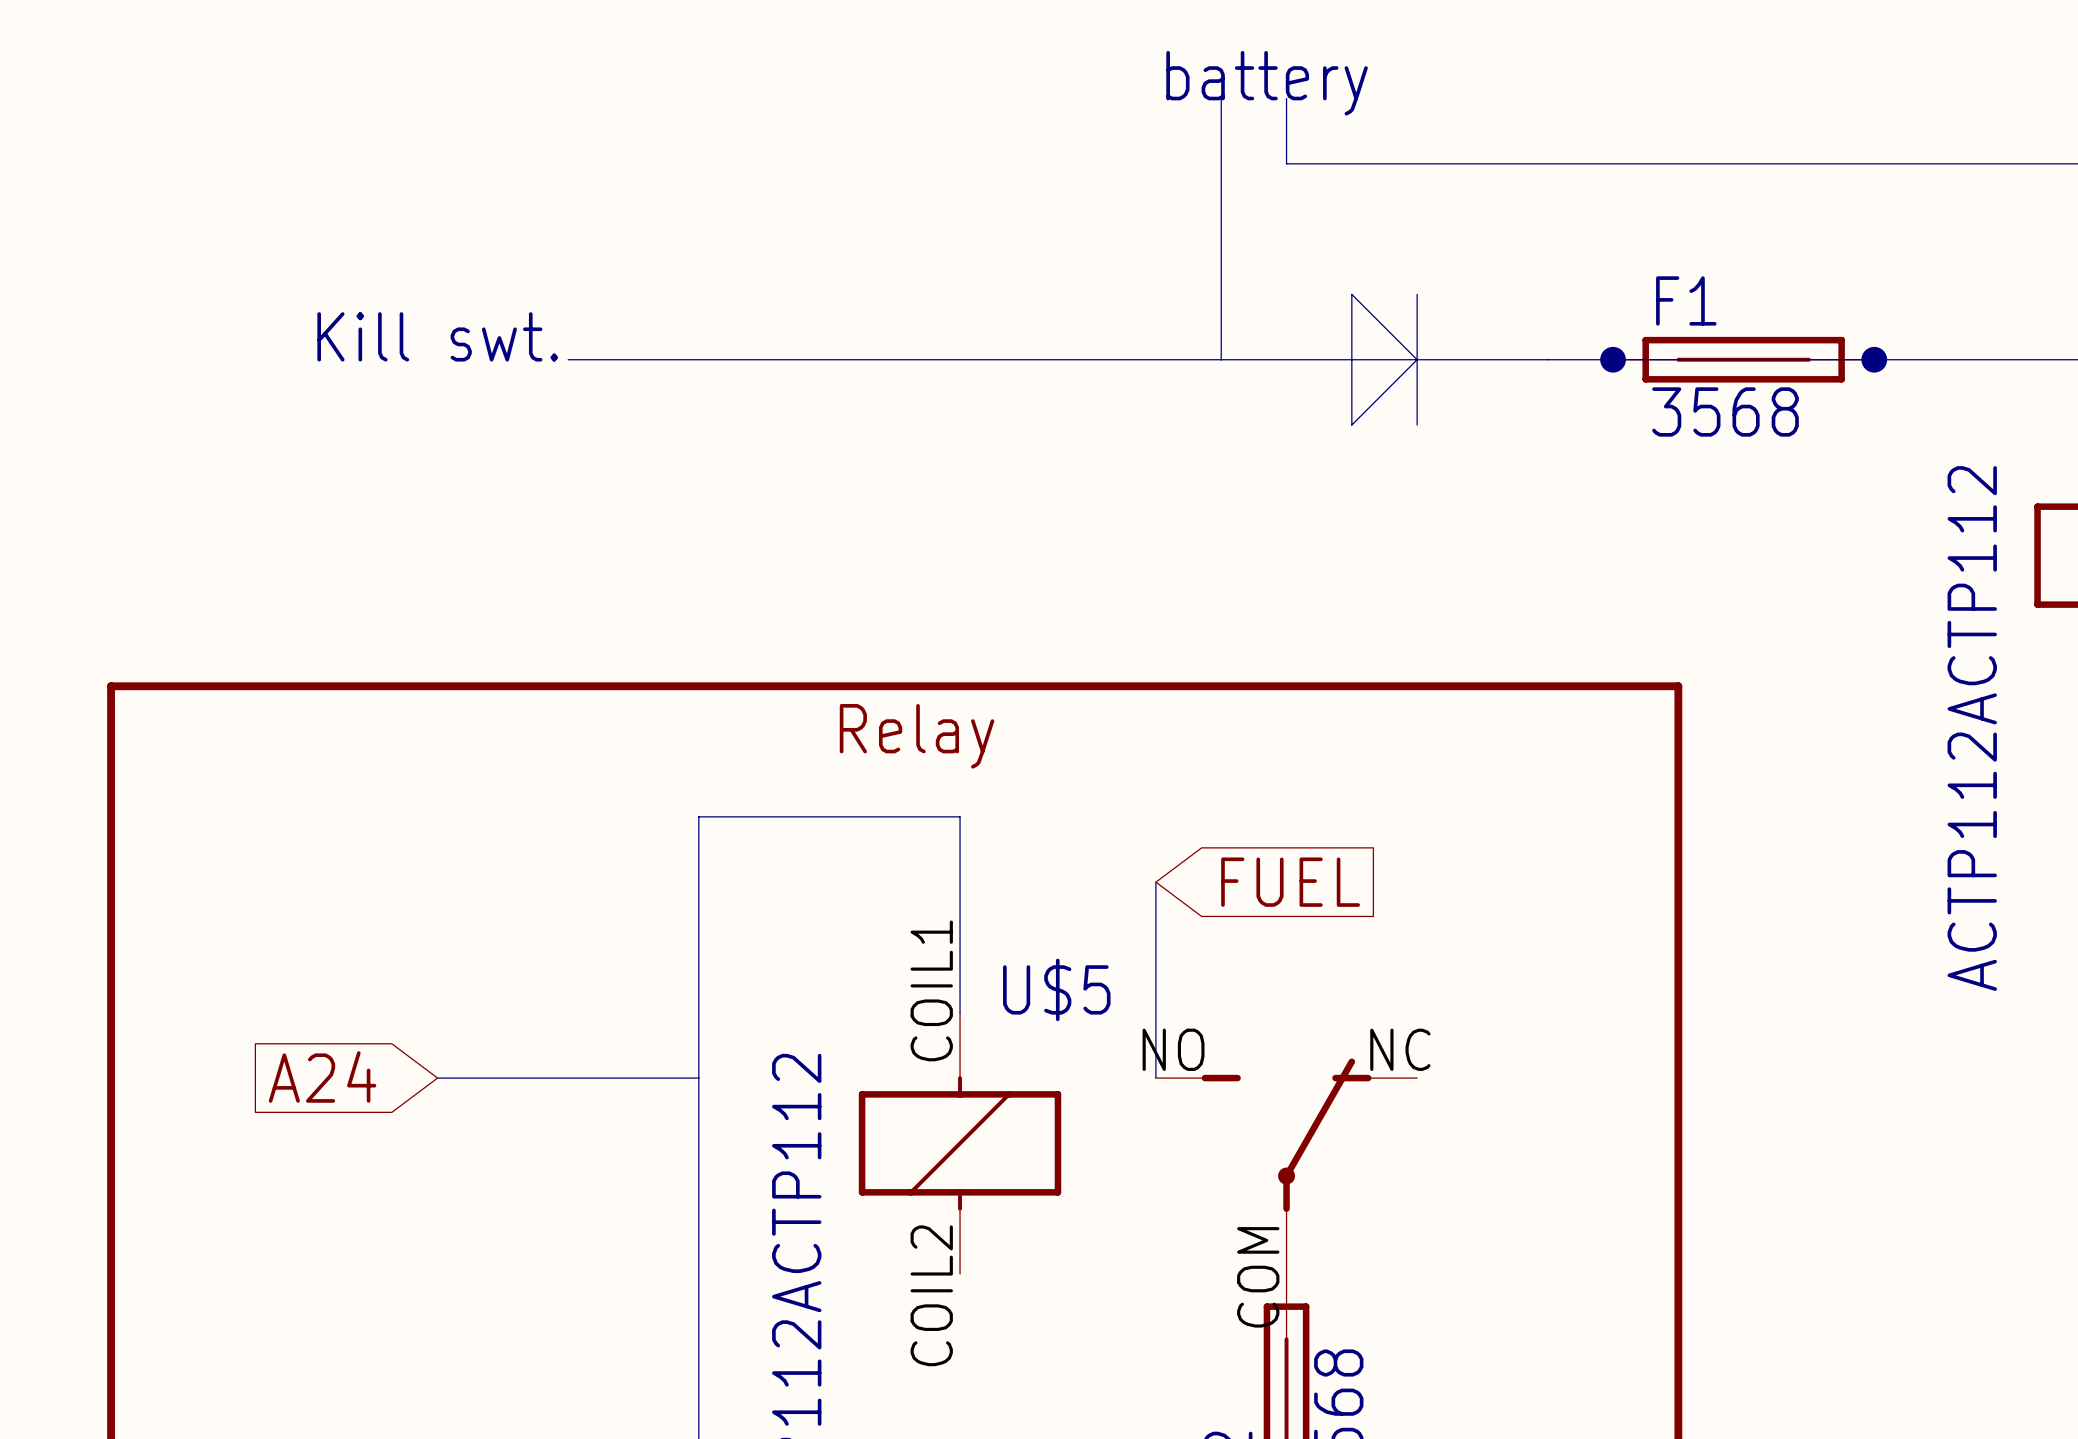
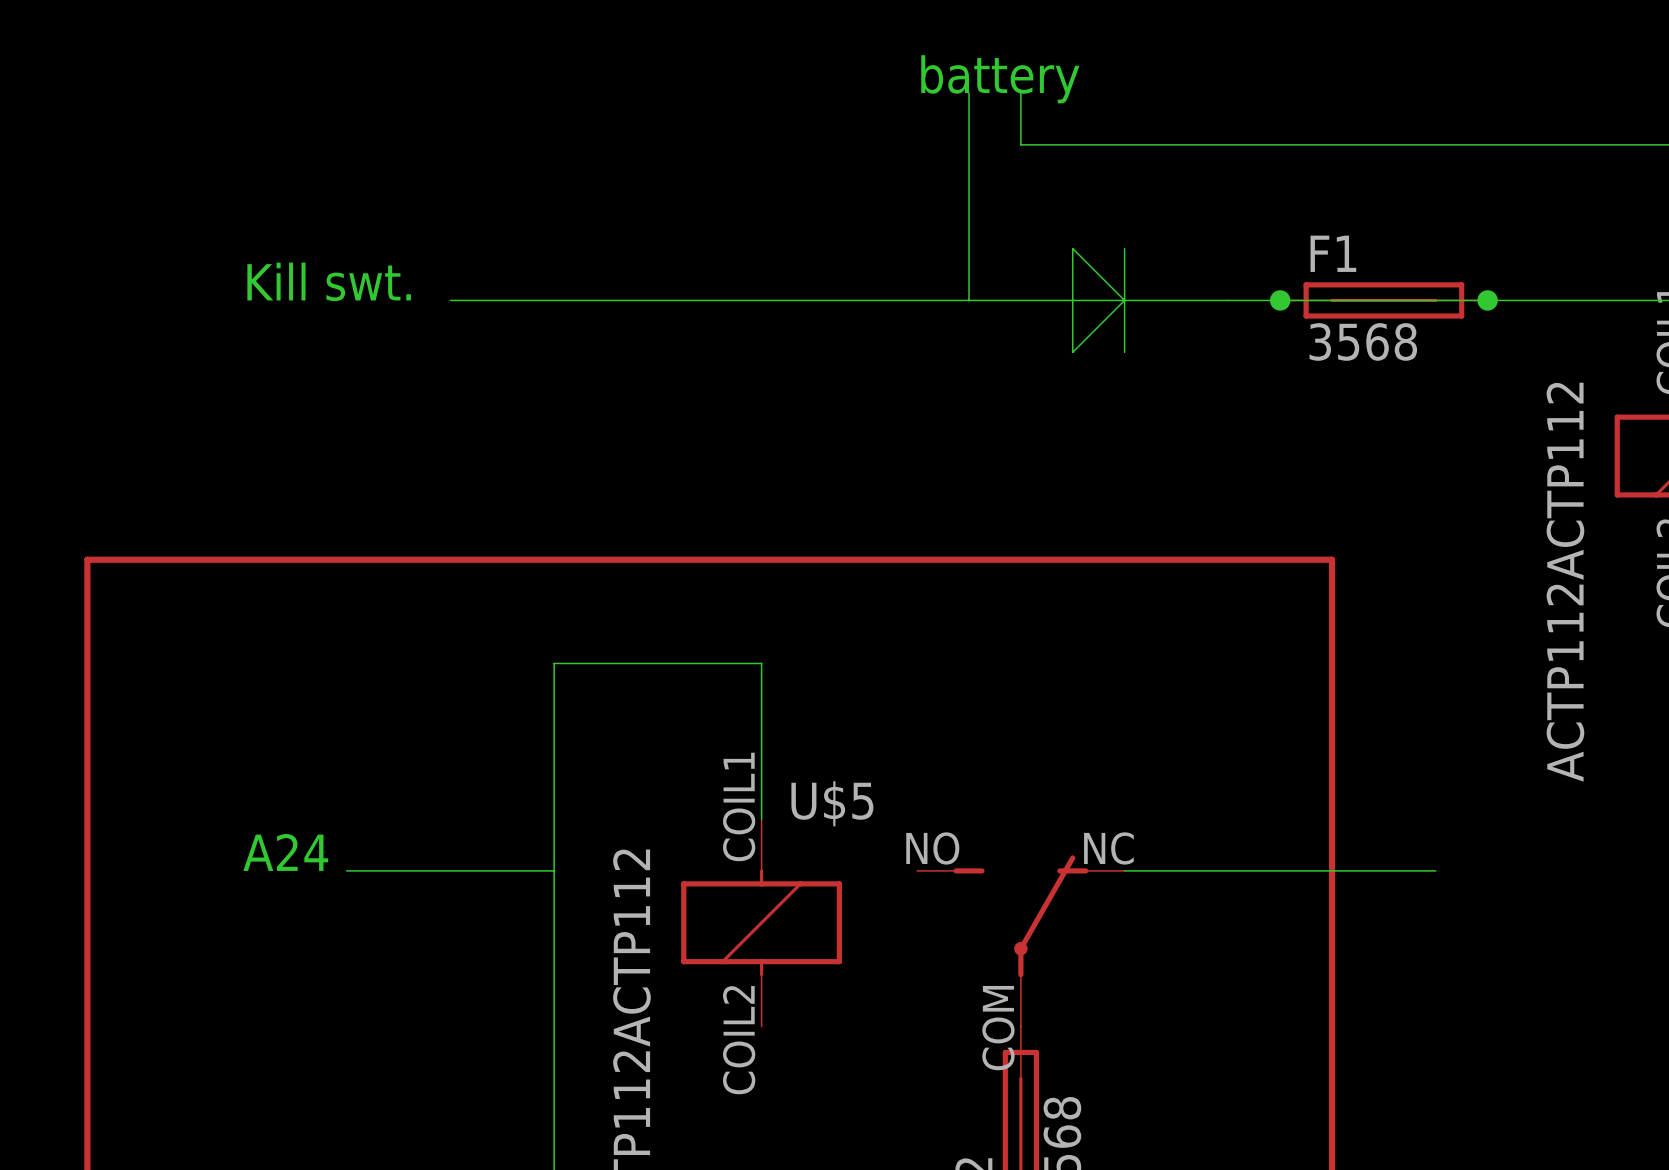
text: Relay (917, 736) -> none
wire: (1155, 882) (1155, 1078) -> none
global label: FUEL (1290, 882) -> none
text: none -> A24 (285, 852)
global label: A24 (322, 1076) -> none
wire: none -> (1124, 870) (1435, 870)

